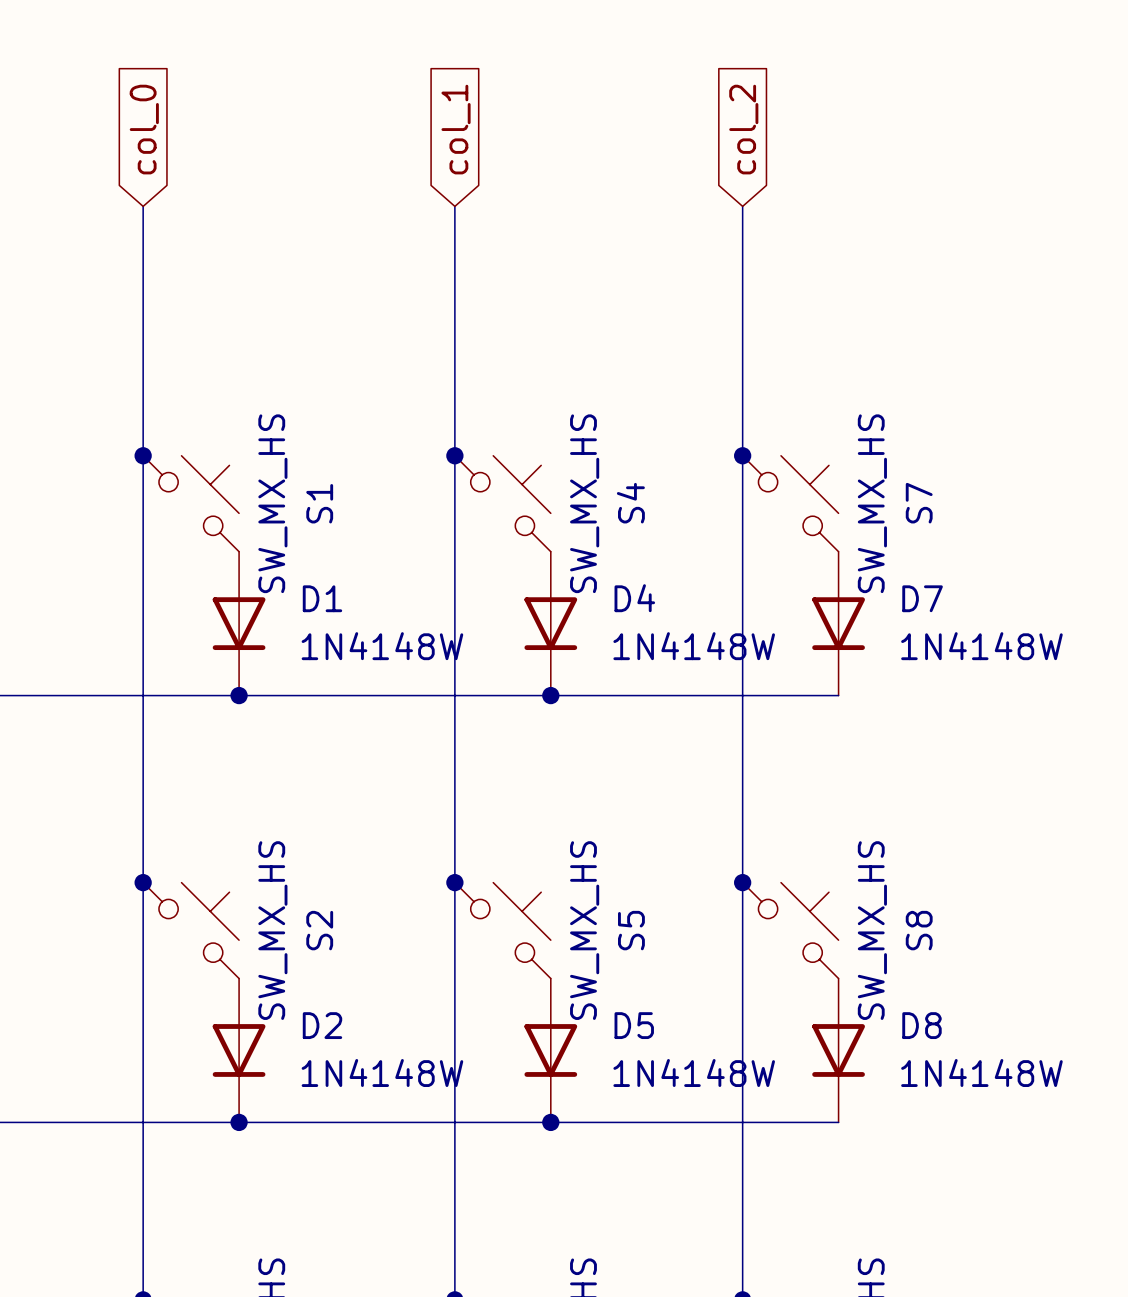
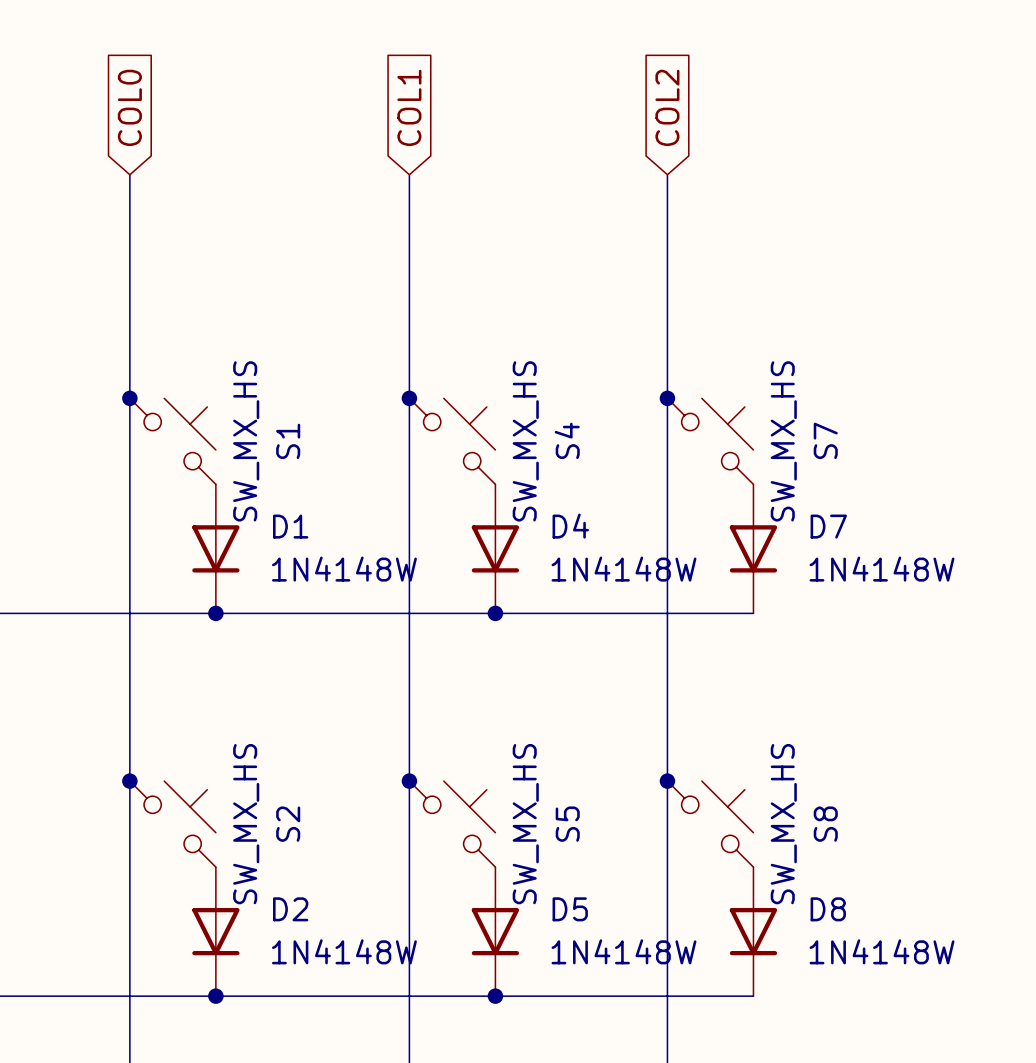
global label: col_0 (144, 129) -> COL0 (129, 107)
global label: col_1 (456, 129) -> COL1 (409, 107)
global label: col_2 (743, 129) -> COL2 (667, 107)

